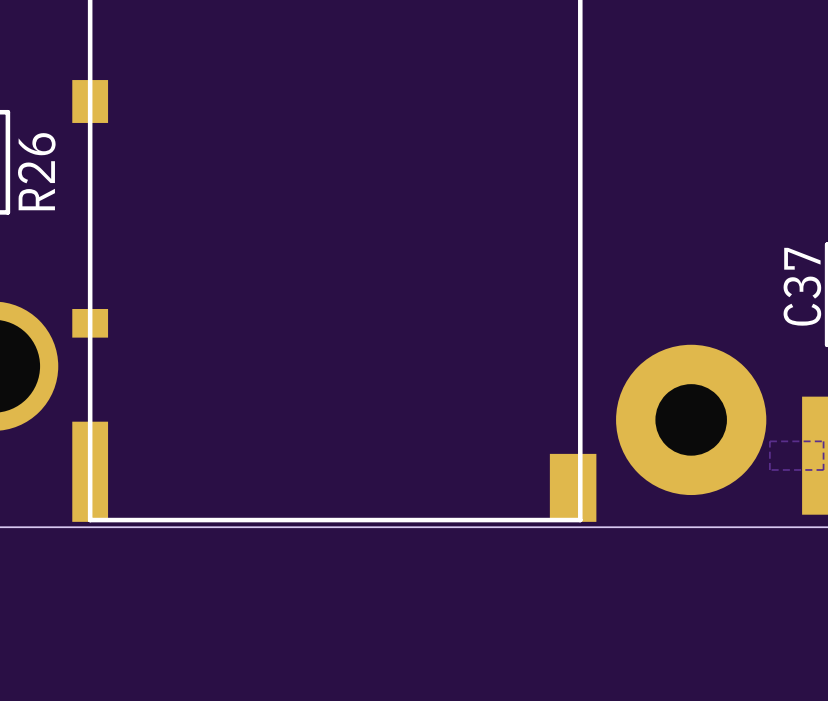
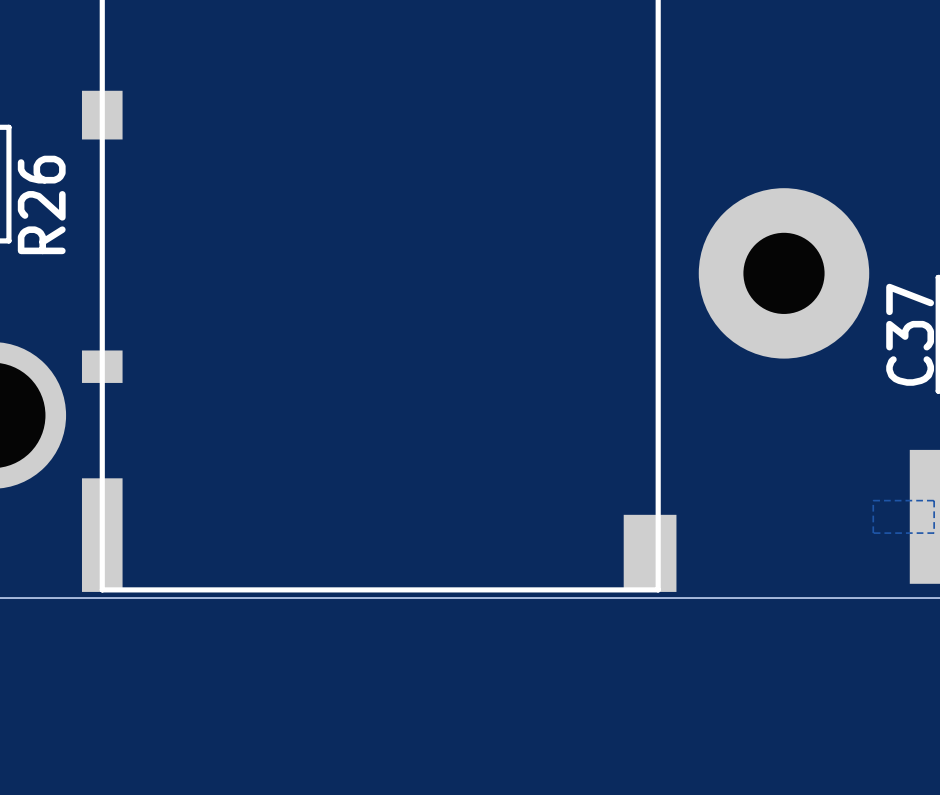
part position: (691, 419) -> (783, 273)

